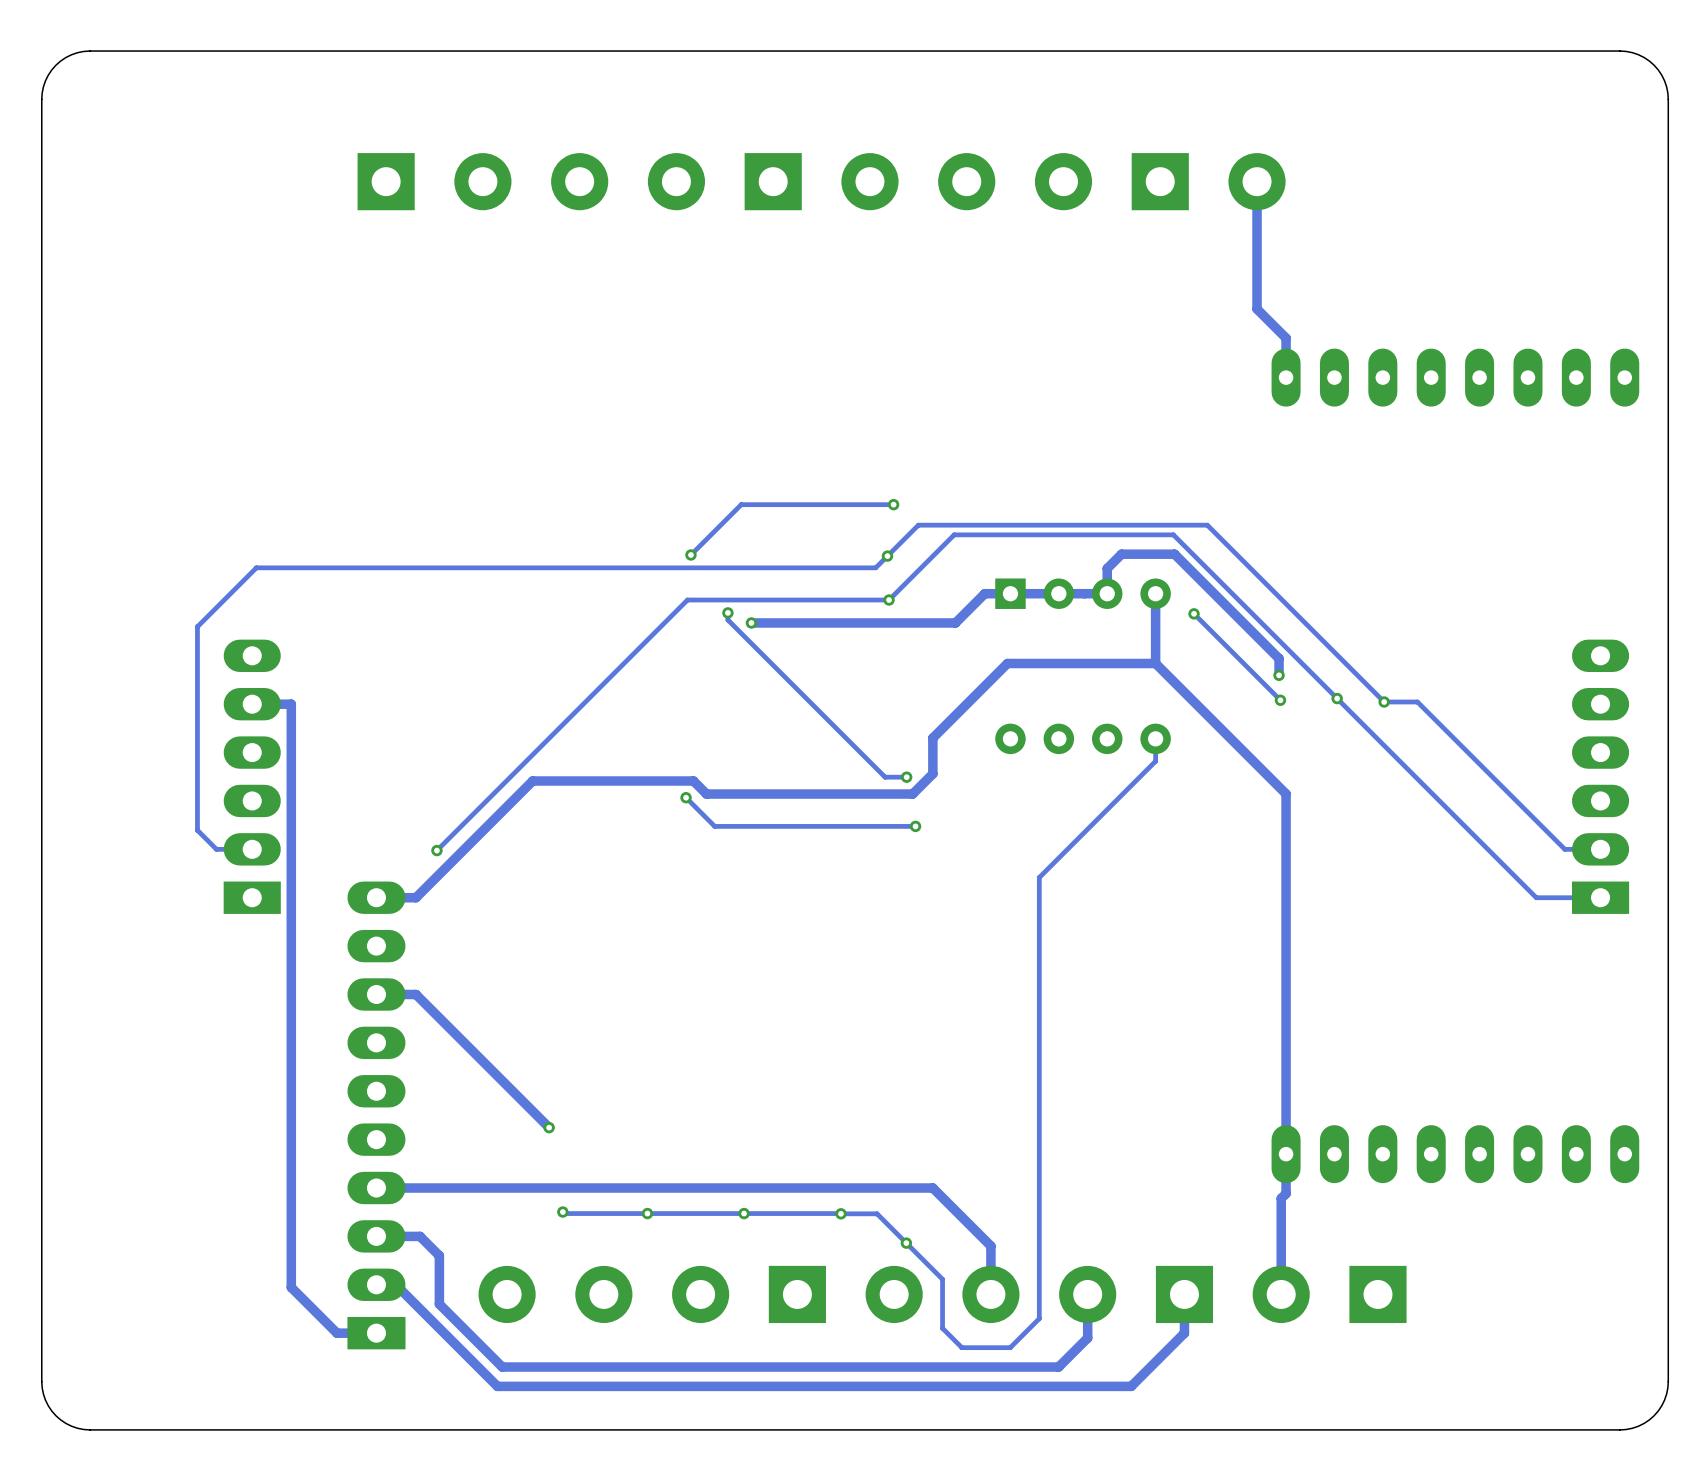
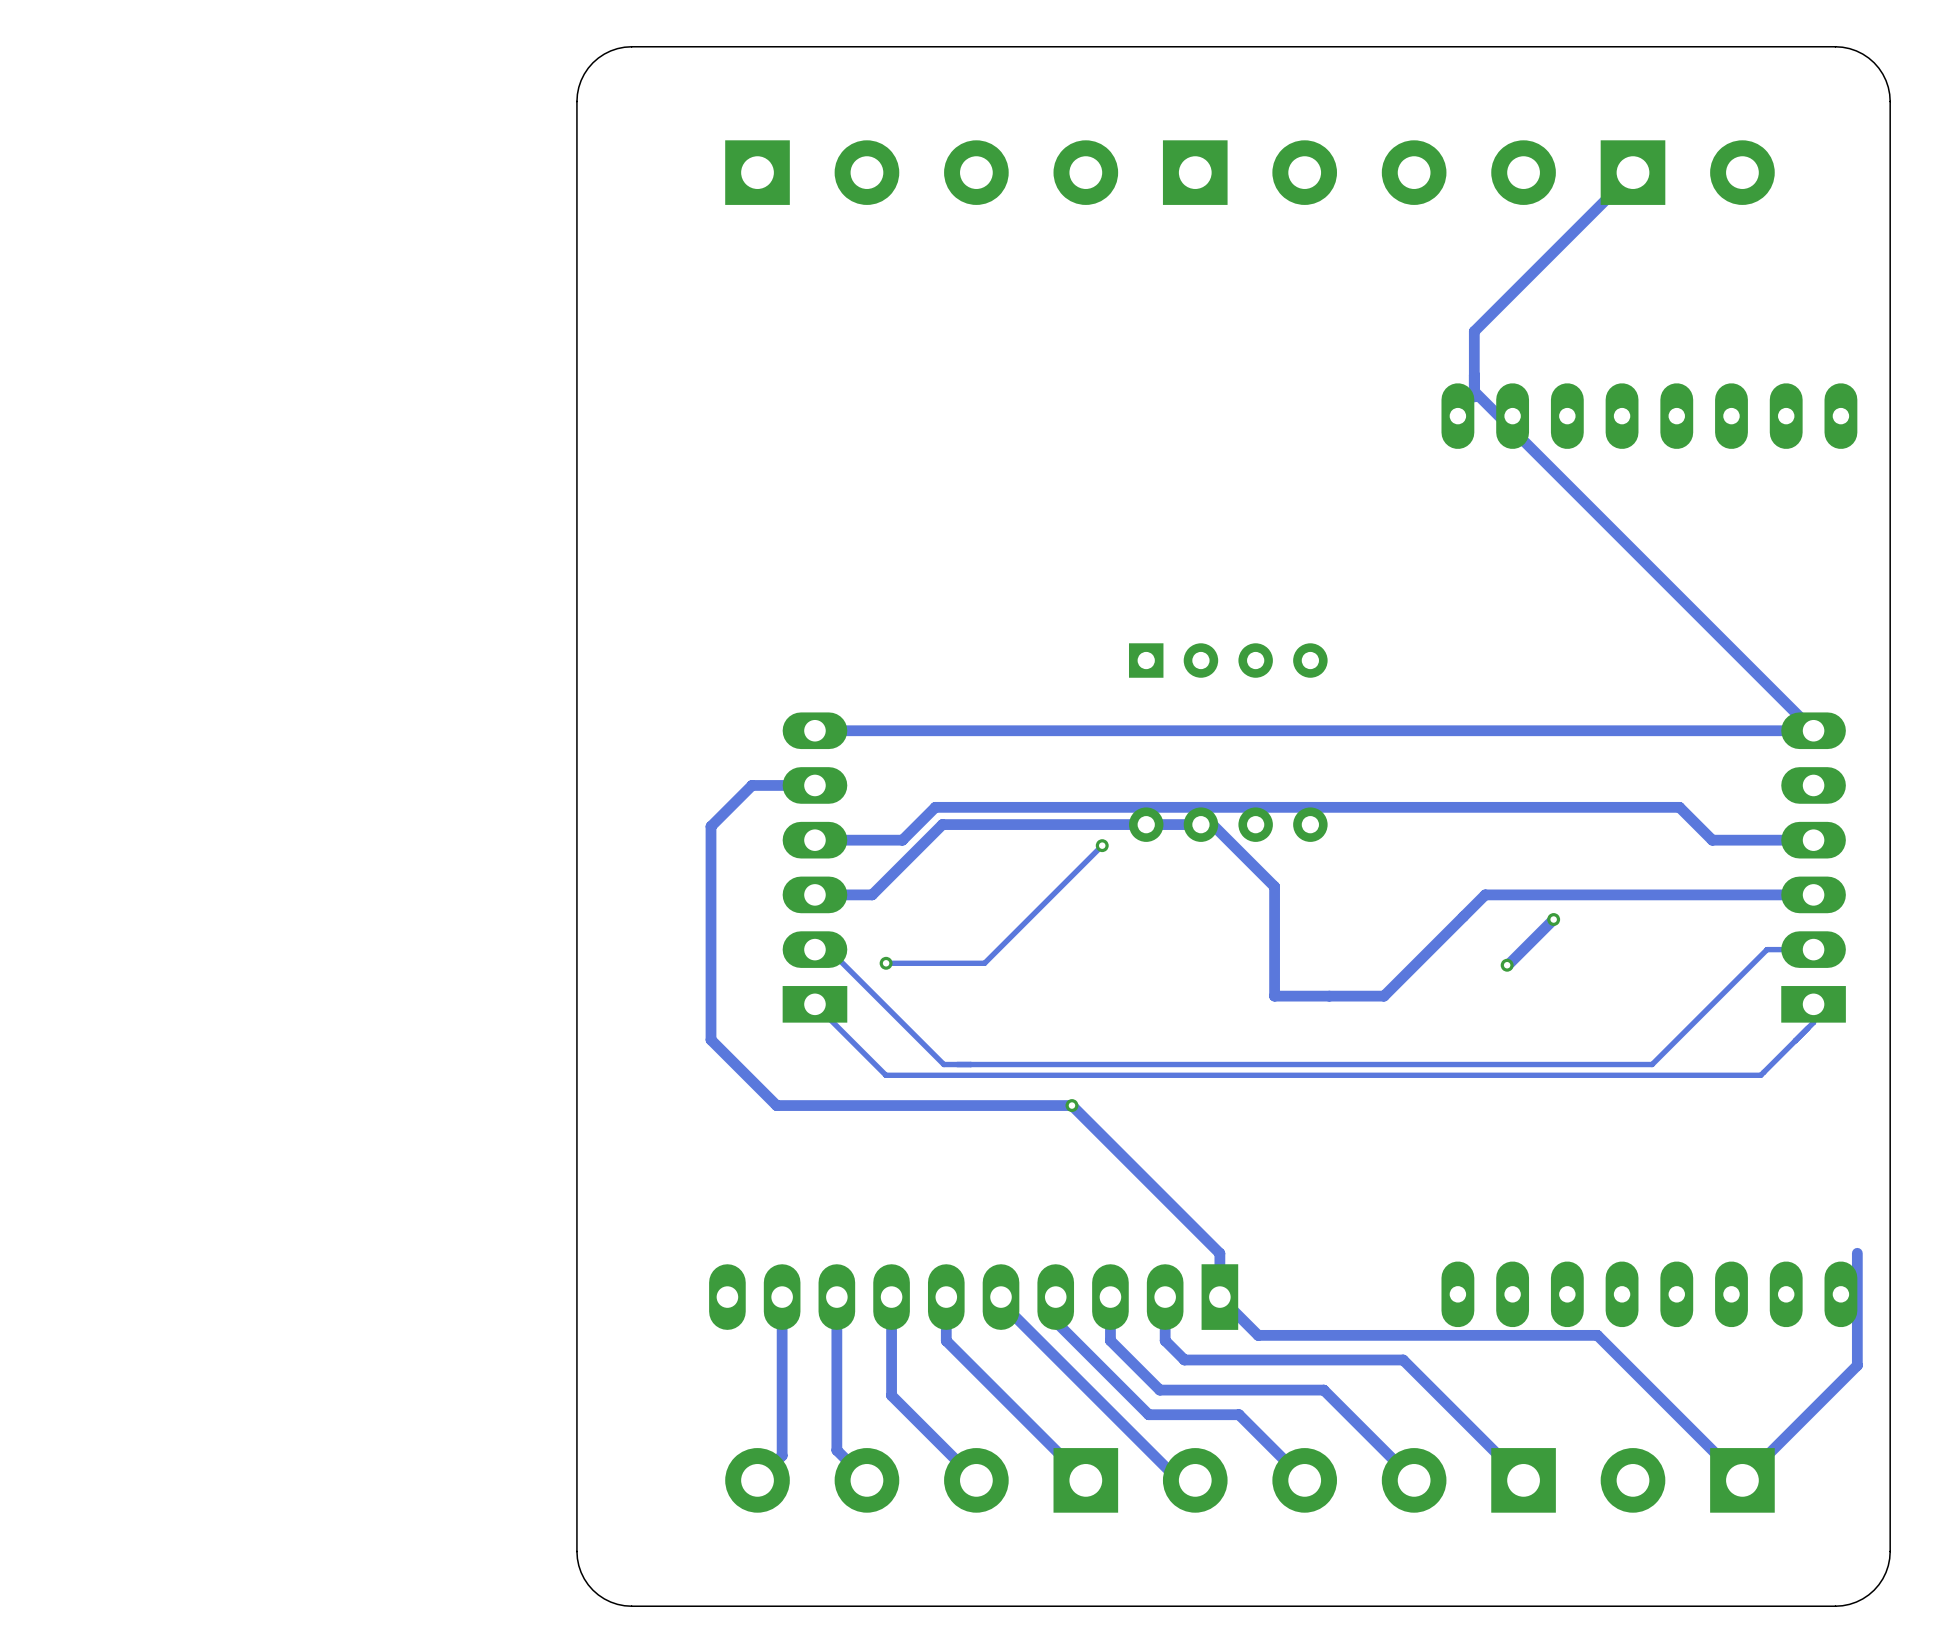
board edge: (555, 51) (83, 51) (71, 54) (55, 65) (45, 80) (41, 99) (41, 1381) (45, 1400) (51, 1411) (60, 1419) (77, 1428) (90, 1429) (555, 1429) -> (631, 46) (610, 50) (592, 62) (581, 80) (576, 101) (576, 1551) (581, 1572) (592, 1590) (610, 1602) (631, 1606)
part: none -> (1359, 172)
track: none -> (1633, 172) (1474, 331) (1474, 396)
part: (531, 181) -> none
part position: (918, 181) -> (921, 172)
part position: (1208, 181) -> (1687, 172)
track: (1257, 181) (1257, 309) (1286, 338) (1286, 377) -> none
track: none -> (1474, 391) (1813, 730) (814, 730)
track: (893, 504) (741, 504) (690, 554) -> none
via: (893, 504) -> none
via: (690, 554) -> none
via: (887, 556) -> none
track: (1155, 593) (1155, 663) -> none
via: (889, 600) -> none
track: (727, 612) (727, 619) (885, 777) (906, 777) -> none
via: (727, 612) -> none
track: (1194, 613) (1280, 700) -> none
via: (1194, 613) -> none
track: (751, 622) (955, 622) (984, 593) (1107, 593) (1107, 568) (1121, 554) (1174, 554) (1279, 658) (1279, 675) -> none
via: (751, 622) -> none
track: (1155, 663) (1286, 793) (1286, 1193) (1281, 1198) (1281, 1294) -> none
track: (1155, 663) (1007, 663) (932, 738) (932, 773) (912, 794) (706, 794) (693, 781) (532, 781) (415, 897) (376, 897) -> none
via: (1279, 675) -> none
via: (1337, 698) -> none
via: (1280, 700) -> none
via: (1384, 702) -> none
track: (252, 704) (291, 704) (291, 1287) (336, 1333) (376, 1333) -> none
track: none -> (814, 785) (752, 785) (711, 826) (711, 1039) (776, 1105) (1071, 1105) (1219, 1253) (1219, 1297) (1258, 1335) (1597, 1335) (1742, 1480) (1857, 1365) (1857, 1253)
track: (1155, 738) (1155, 761) (1039, 877) (1039, 1318) (1010, 1347) (961, 1347) (942, 1328) (942, 1279) (877, 1213) (840, 1213) -> none
track: none -> (1813, 840) (1712, 840) (1679, 807) (935, 807) (902, 840) (814, 840)
track: none -> (1102, 845) (984, 963) (886, 963)
via: none -> (1102, 845)
part position: (252, 776) -> (814, 867)
via: (906, 777) -> none
track: (686, 797) (714, 826) (915, 826) -> none
via: (686, 797) -> none
track: none -> (1813, 894) (1485, 894) (1384, 996) (1274, 996) (1274, 886) (1212, 824) (942, 824) (872, 894) (814, 894)
track: none -> (1553, 919) (1507, 965)
via: none -> (1553, 919)
via: (915, 826) -> none
track: (1564, 849) (1417, 702) (1384, 702) (1207, 525) (918, 525) (875, 567) (256, 567) (197, 626) (197, 830) (216, 849) (252, 849) -> (1773, 949) (1767, 949) (1652, 1064) (943, 1064) (828, 949) (814, 949)
track: (436, 850) (687, 600) (889, 600) (954, 534) (1173, 534) (1536, 897) (1600, 897) -> (814, 1004) (885, 1075) (1760, 1075) (1813, 1022) (1813, 1004)
via: (436, 850) -> none
via: none -> (886, 963)
via: none -> (1507, 965)
via: none -> (1071, 1105)
track: (376, 994) (415, 994) (549, 1127) -> none
part: (376, 1115) -> none
via: (549, 1127) -> none
track: none -> (782, 1297) (782, 1455) (757, 1480)
track: none -> (836, 1297) (836, 1450) (866, 1480)
track: none -> (891, 1297) (891, 1395) (976, 1480)
track: none -> (946, 1297) (946, 1340) (1085, 1480)
part: none -> (973, 1297)
track: none -> (1001, 1297) (1001, 1302) (1178, 1480) (1195, 1480)
track: none -> (1055, 1297) (1055, 1321) (1148, 1414) (1239, 1414) (1304, 1480)
track: none -> (1110, 1297) (1110, 1340) (1159, 1390) (1323, 1390) (1414, 1480)
track: none -> (1165, 1297) (1165, 1340) (1184, 1360) (1403, 1360) (1523, 1480)
track: (376, 1188) (932, 1188) (990, 1246) (990, 1294) -> none
track: (562, 1212) (564, 1213) (840, 1213) -> none
via: (562, 1212) -> none
via: (647, 1213) -> none
via: (744, 1213) -> none
via: (840, 1213) -> none
track: (376, 1236) (420, 1236) (439, 1255) (439, 1304) (502, 1367) (1058, 1367) (1087, 1338) (1087, 1294) -> none
via: (906, 1243) -> none
track: (376, 1284) (395, 1284) (497, 1386) (1131, 1386) (1184, 1333) (1184, 1294) -> none
part: (652, 1294) -> none
part: (1039, 1294) -> none
part position: (1329, 1294) -> (1687, 1480)
part: none -> (921, 1480)
part: none -> (1359, 1480)

